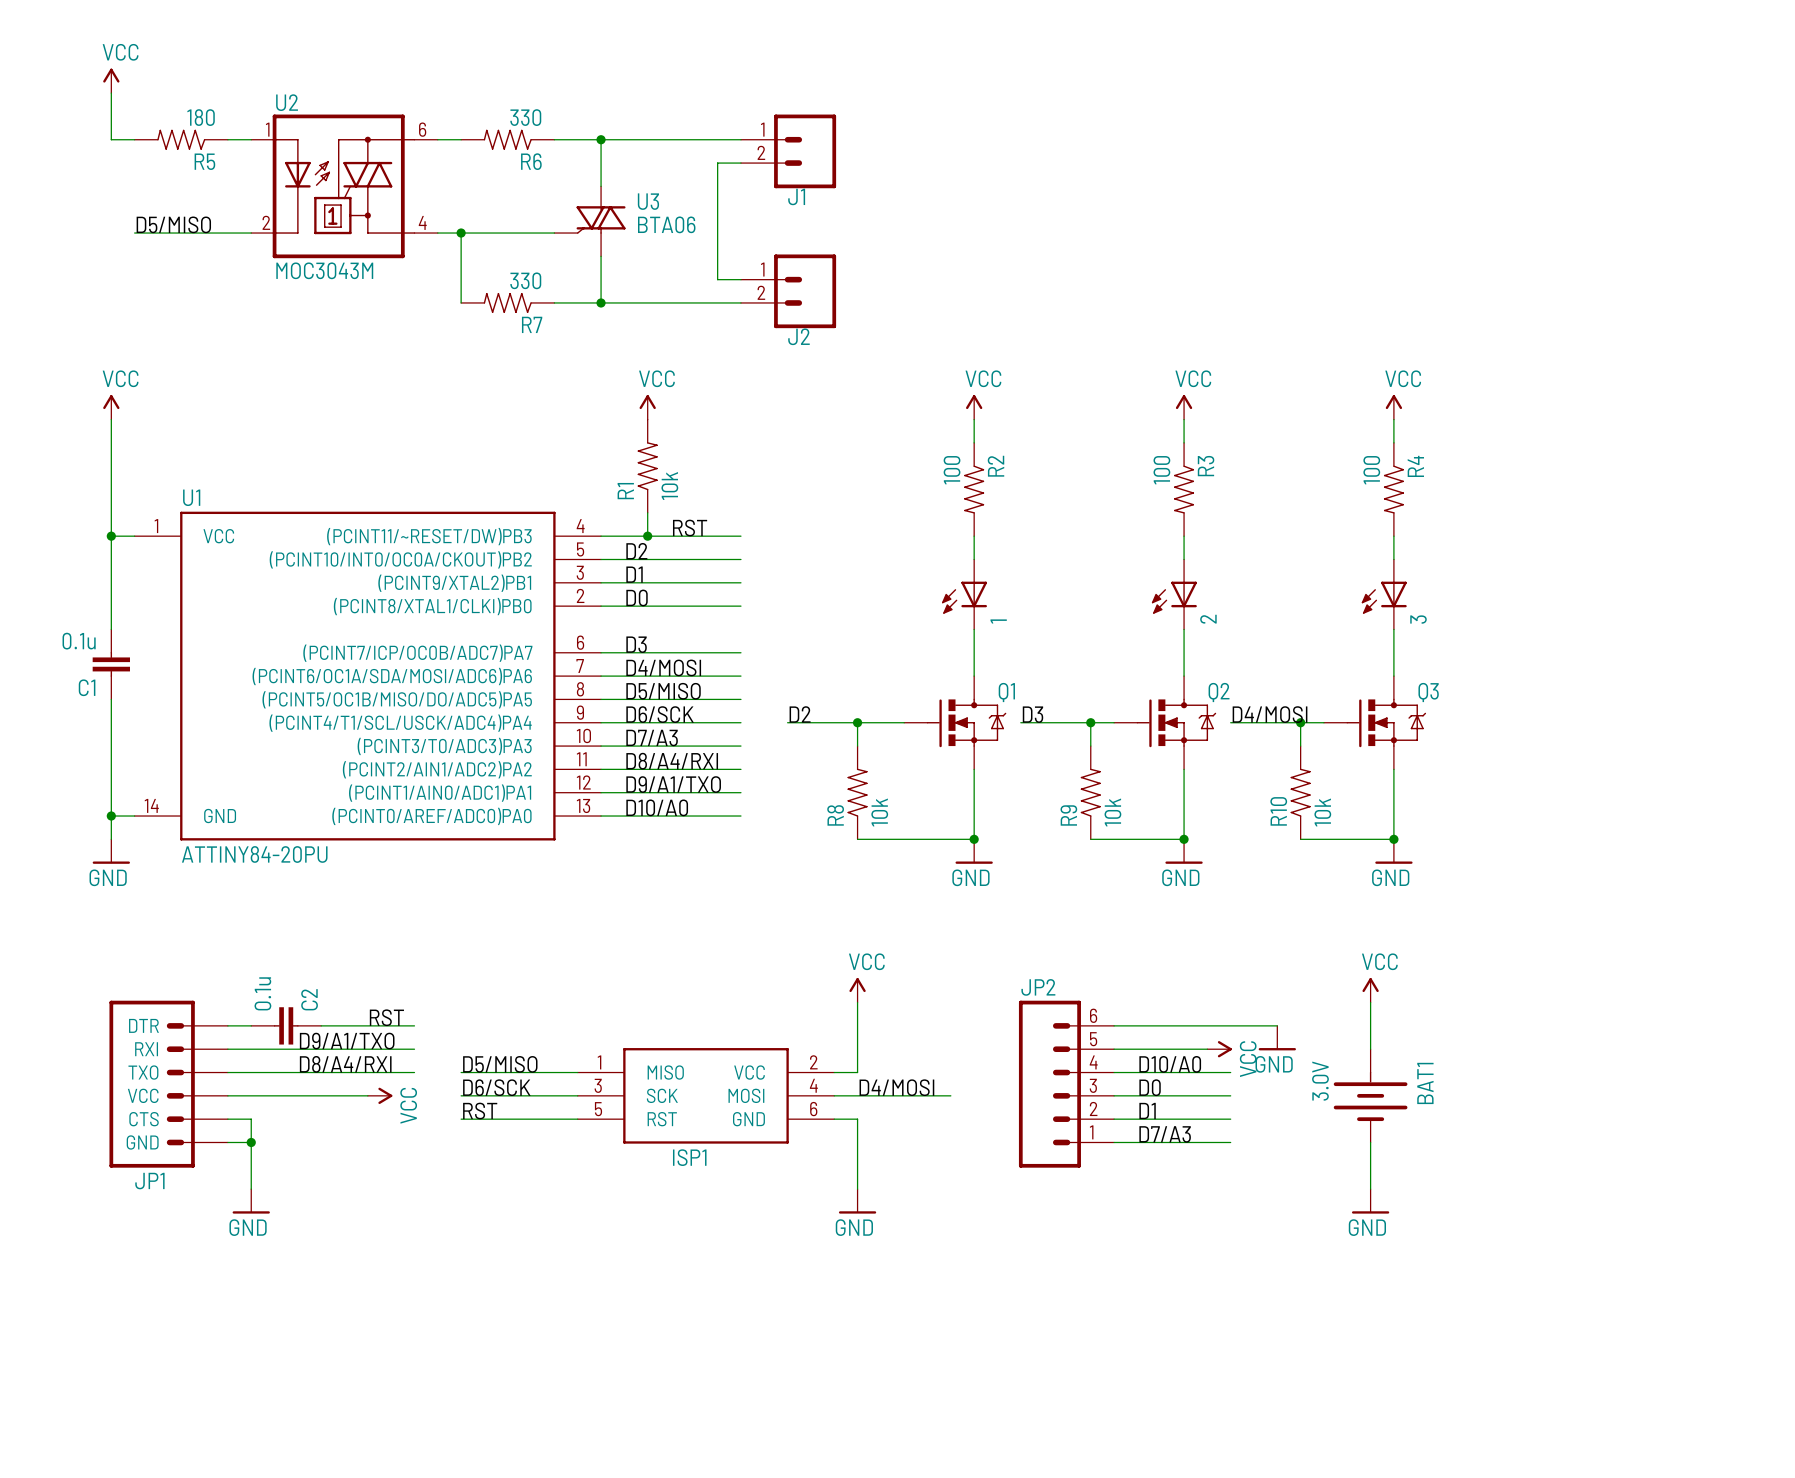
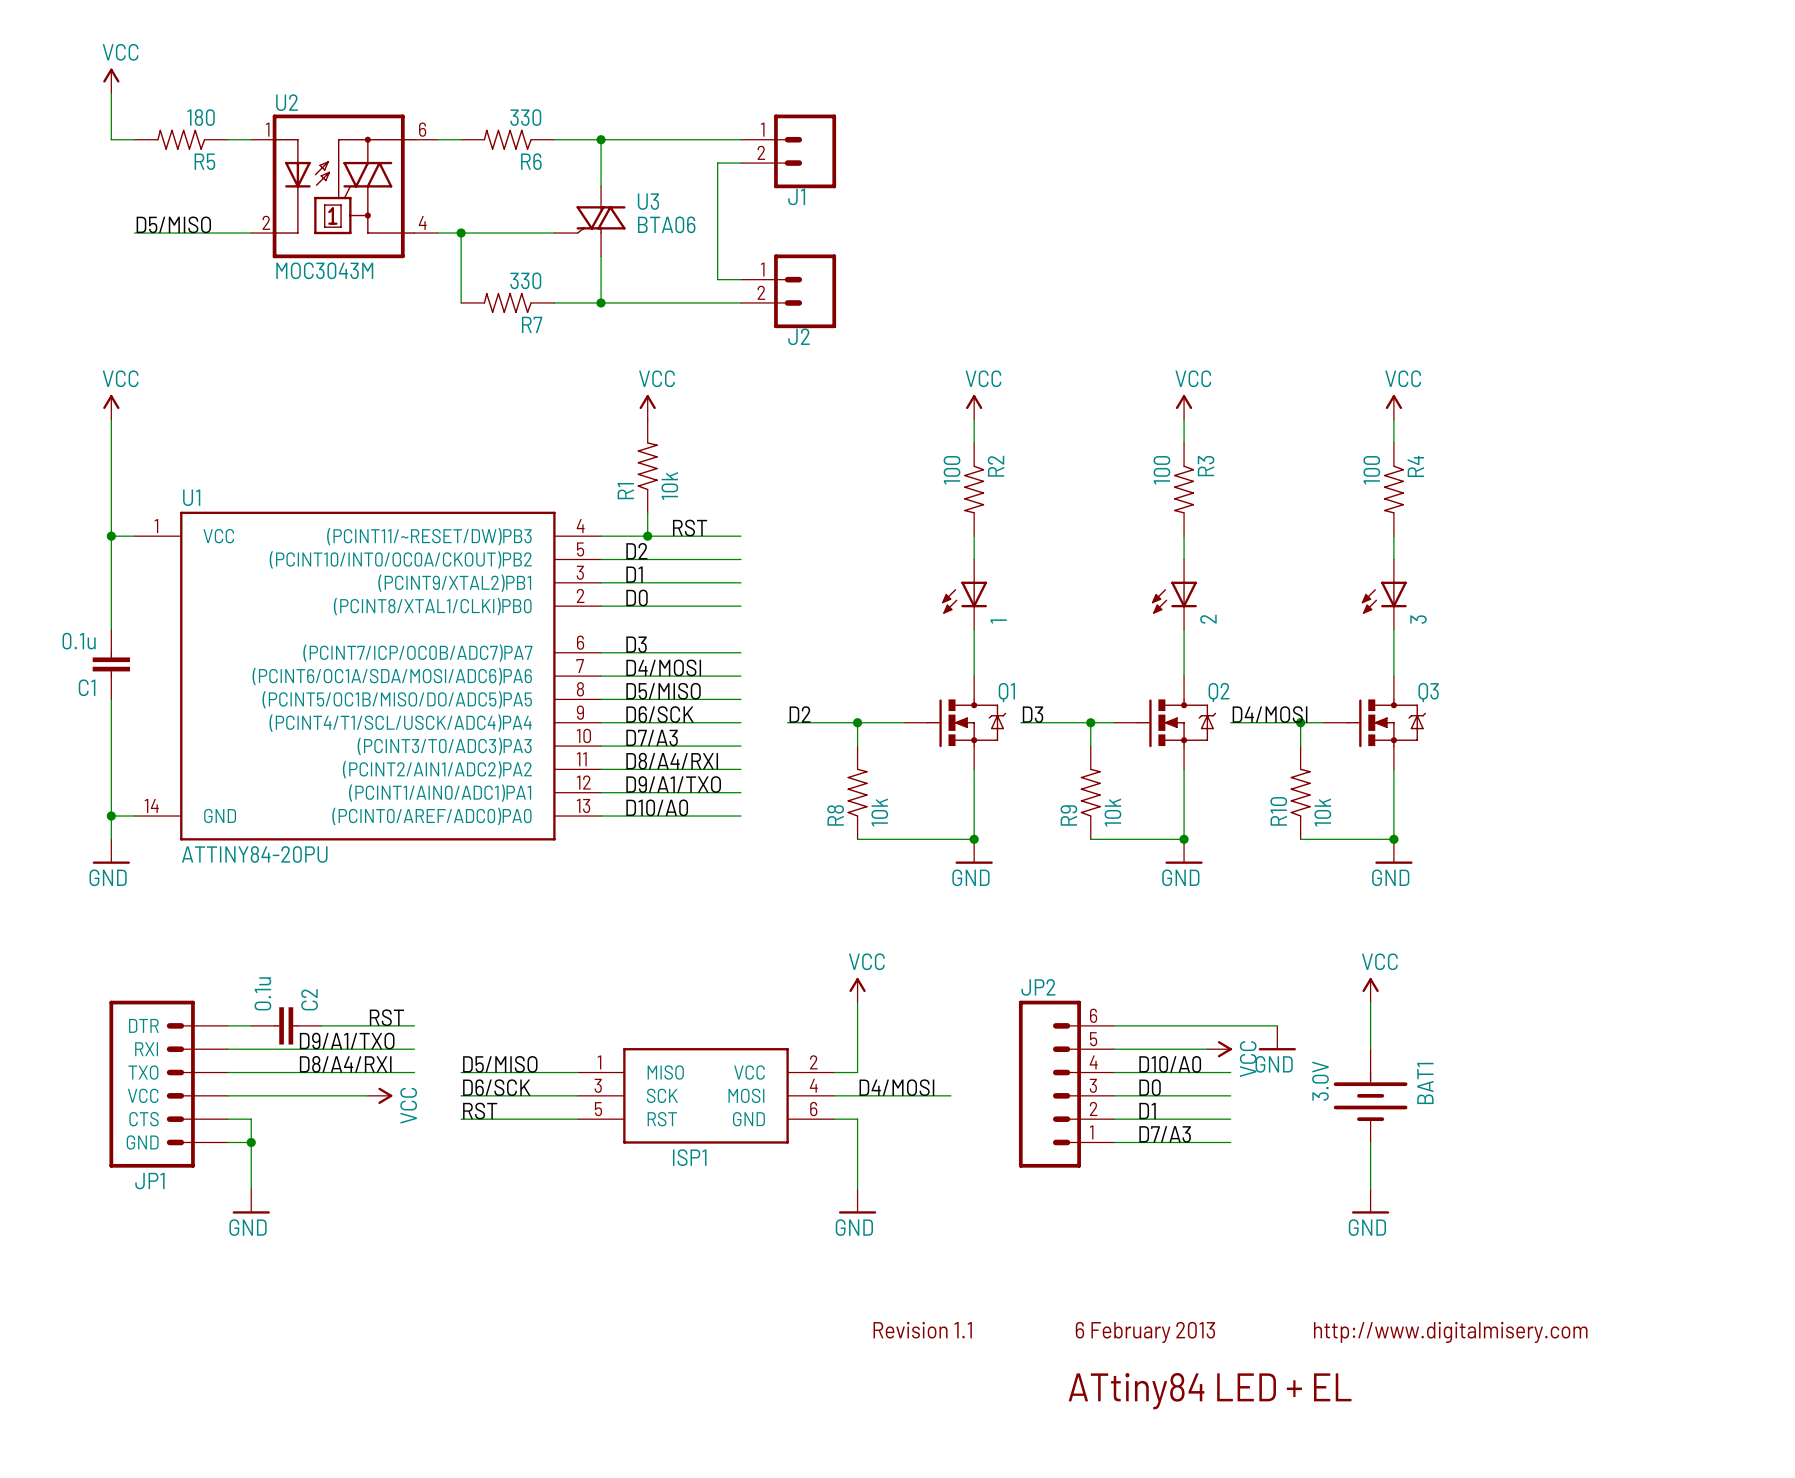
text: none -> Revision 1.1 (922, 1330)
text: none -> 6 February 2013 (1145, 1332)
text: none -> http://www.digitalmisery.com (1450, 1332)
text: none -> ATtiny84 LED + EL (1210, 1391)

